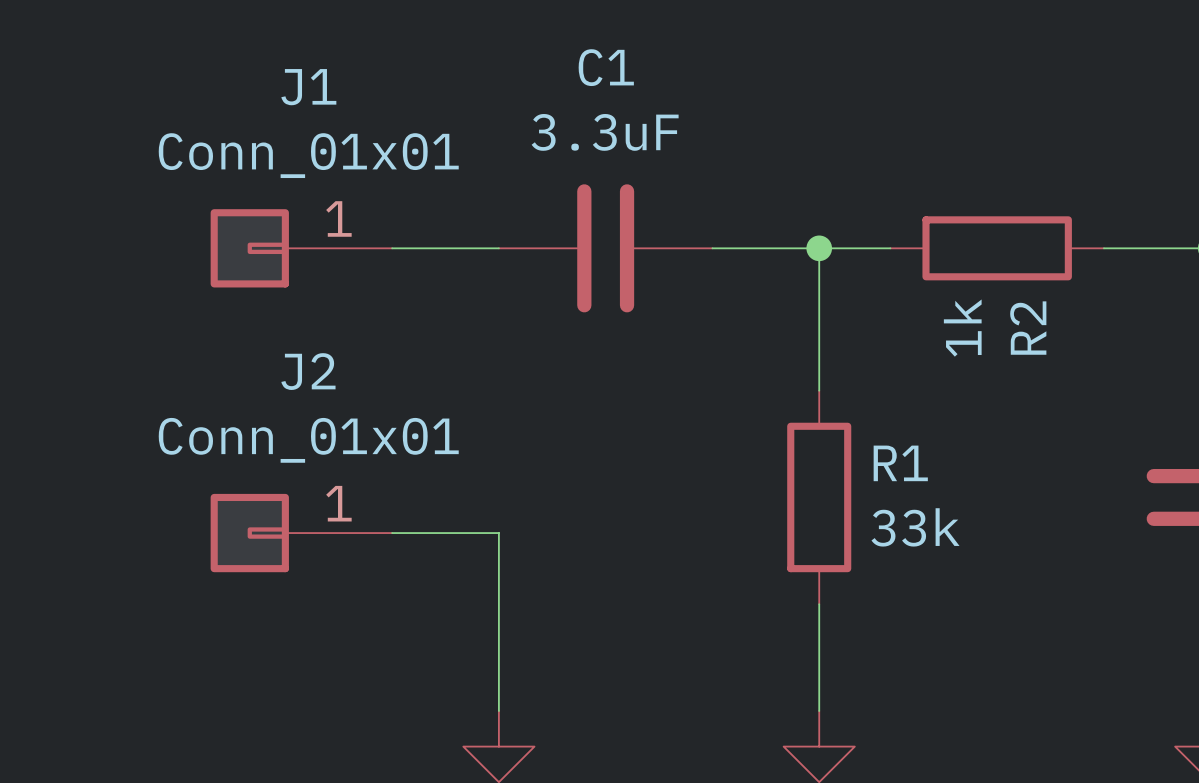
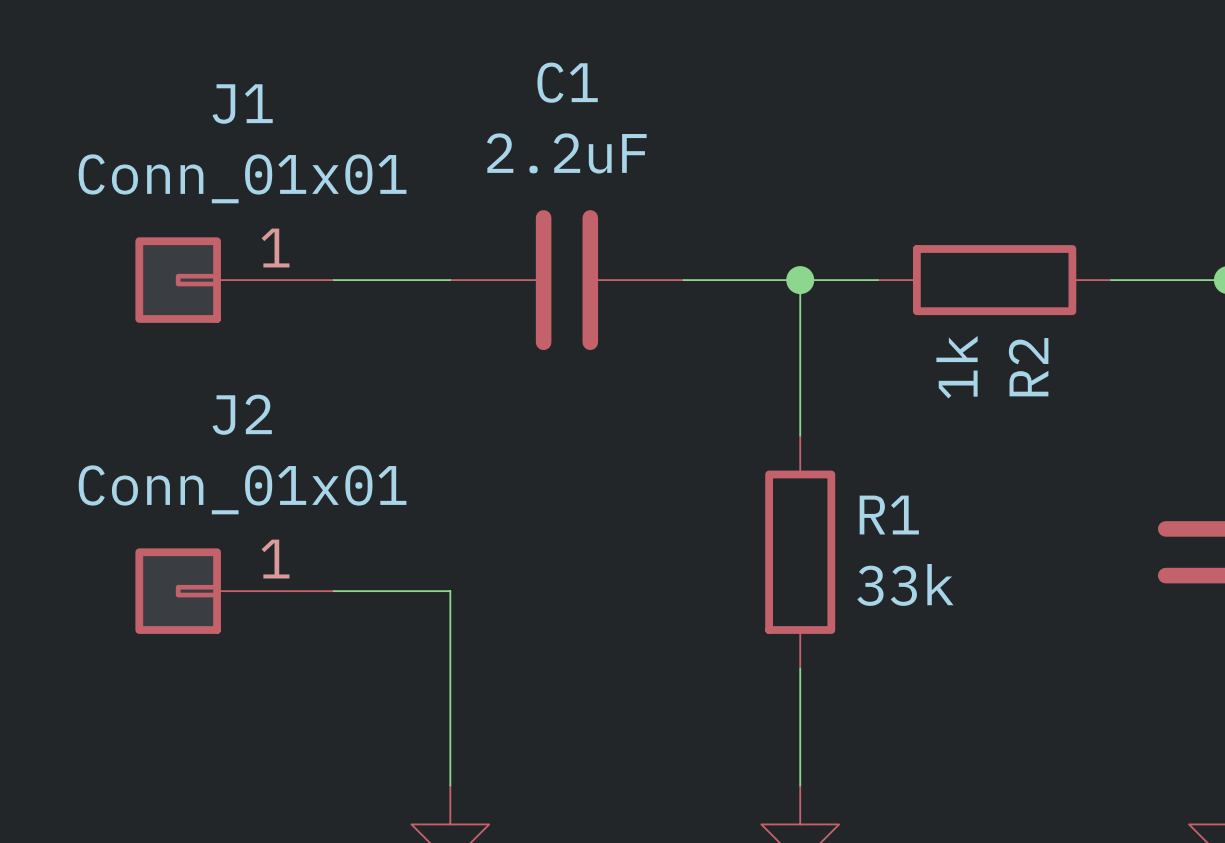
C1 value: 3.3uF (605, 132) -> 2.2uF (566, 153)

